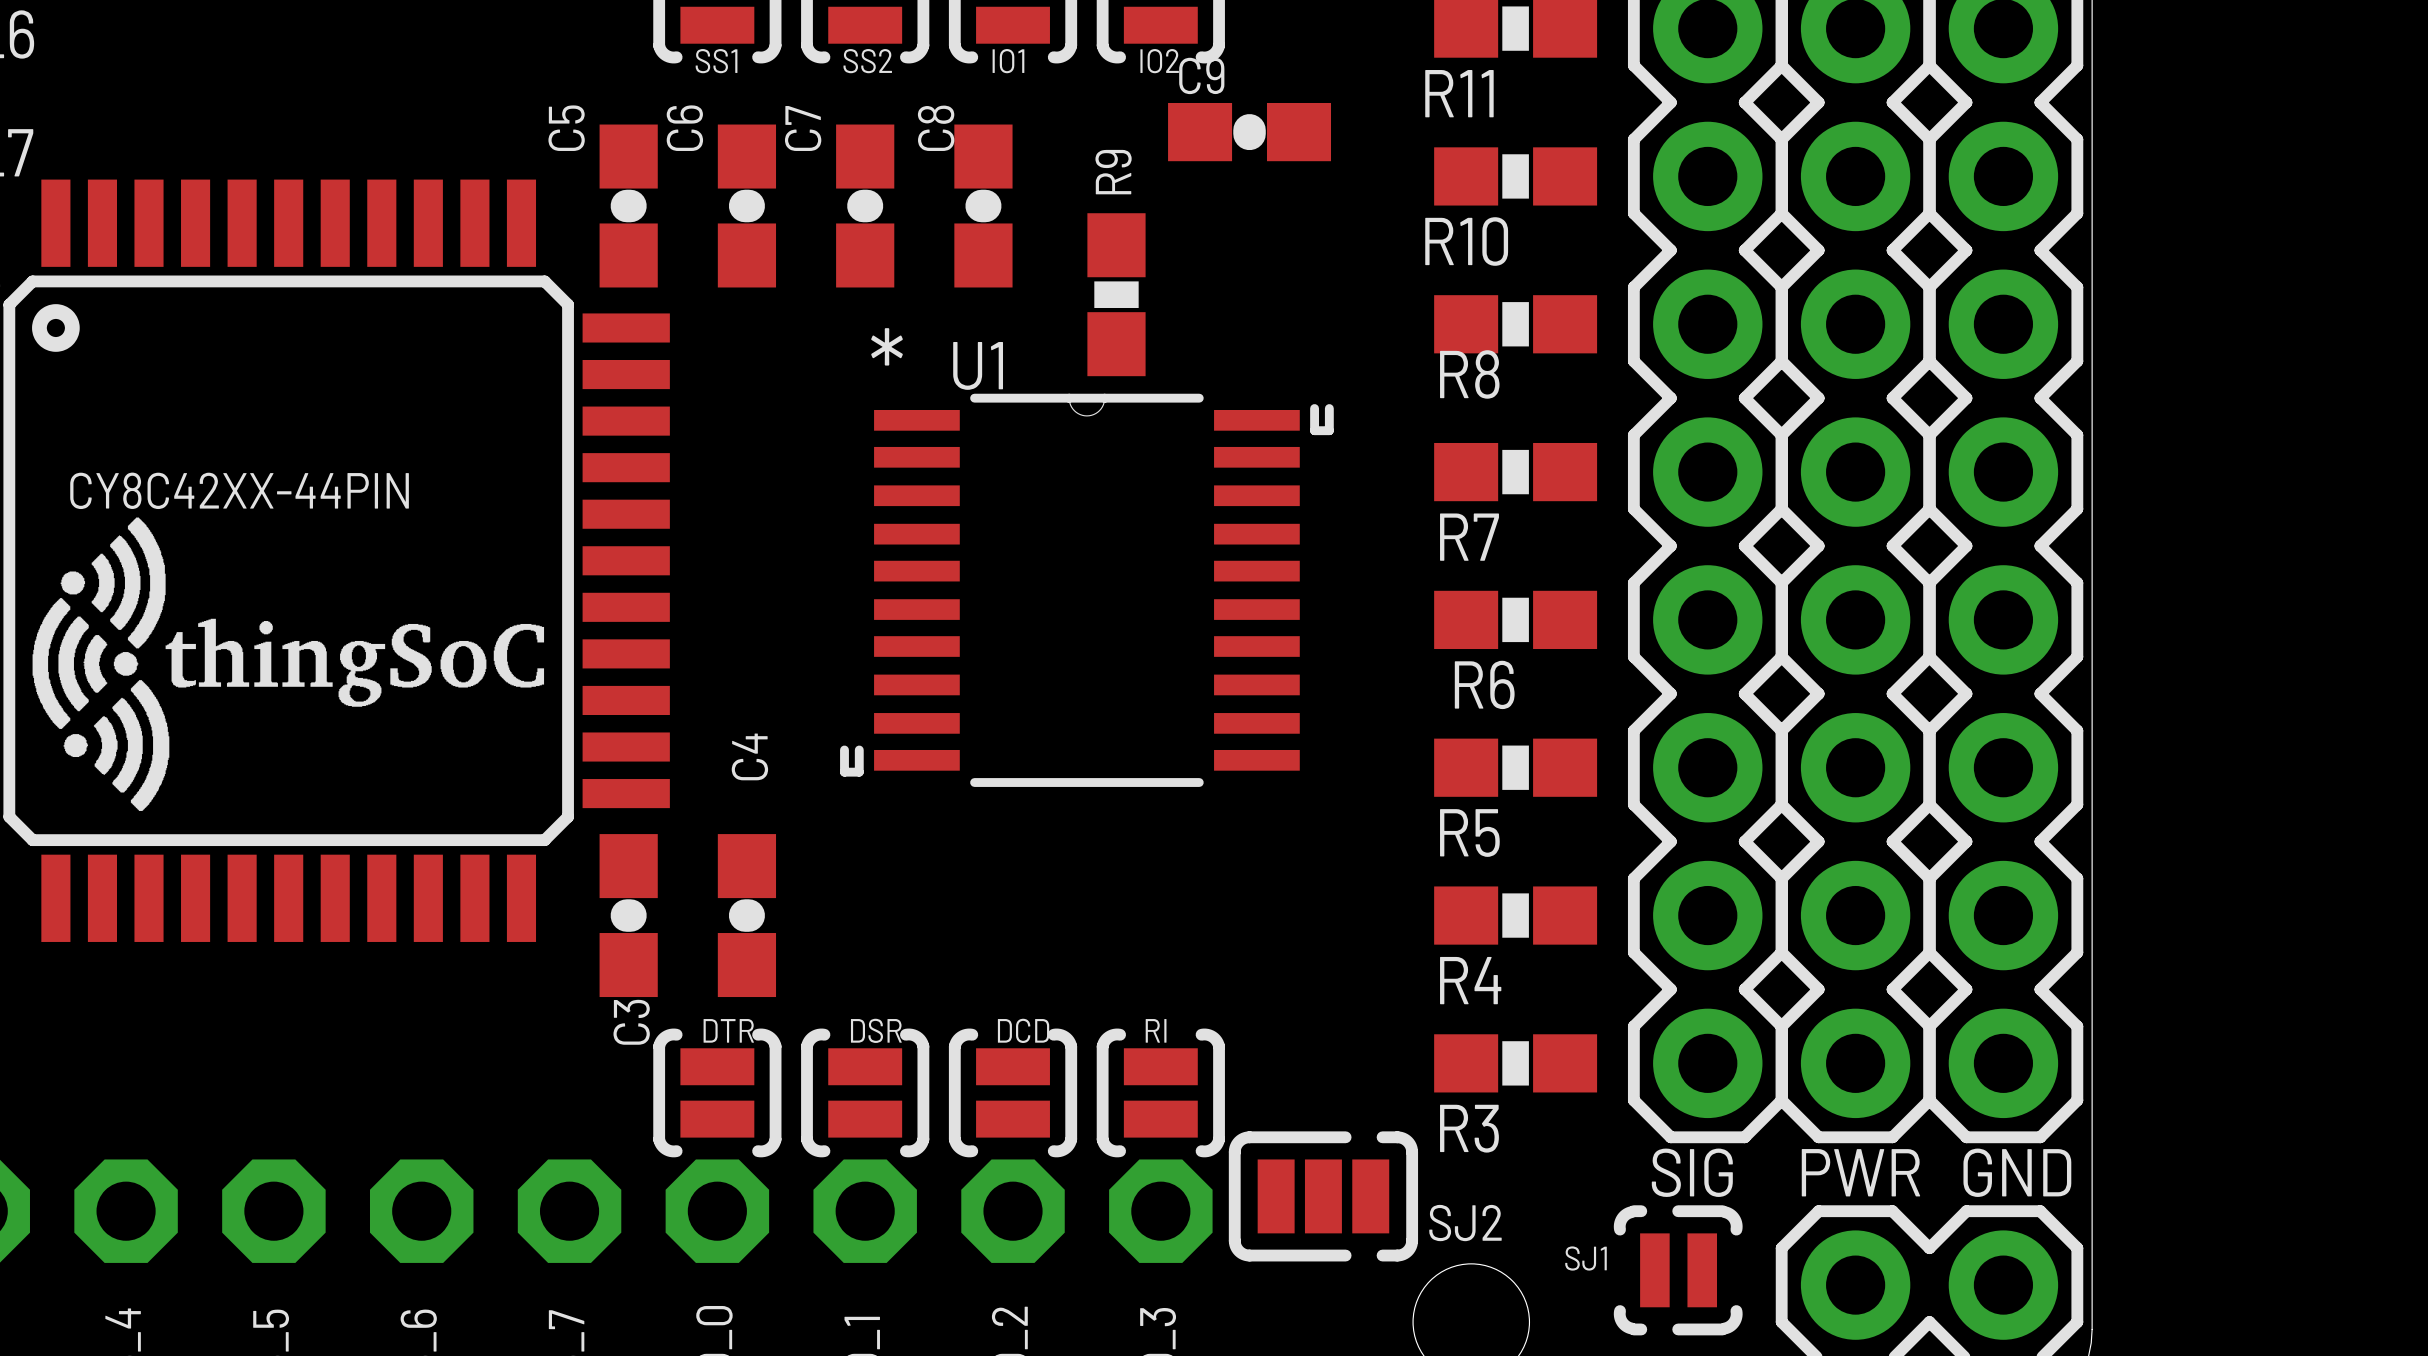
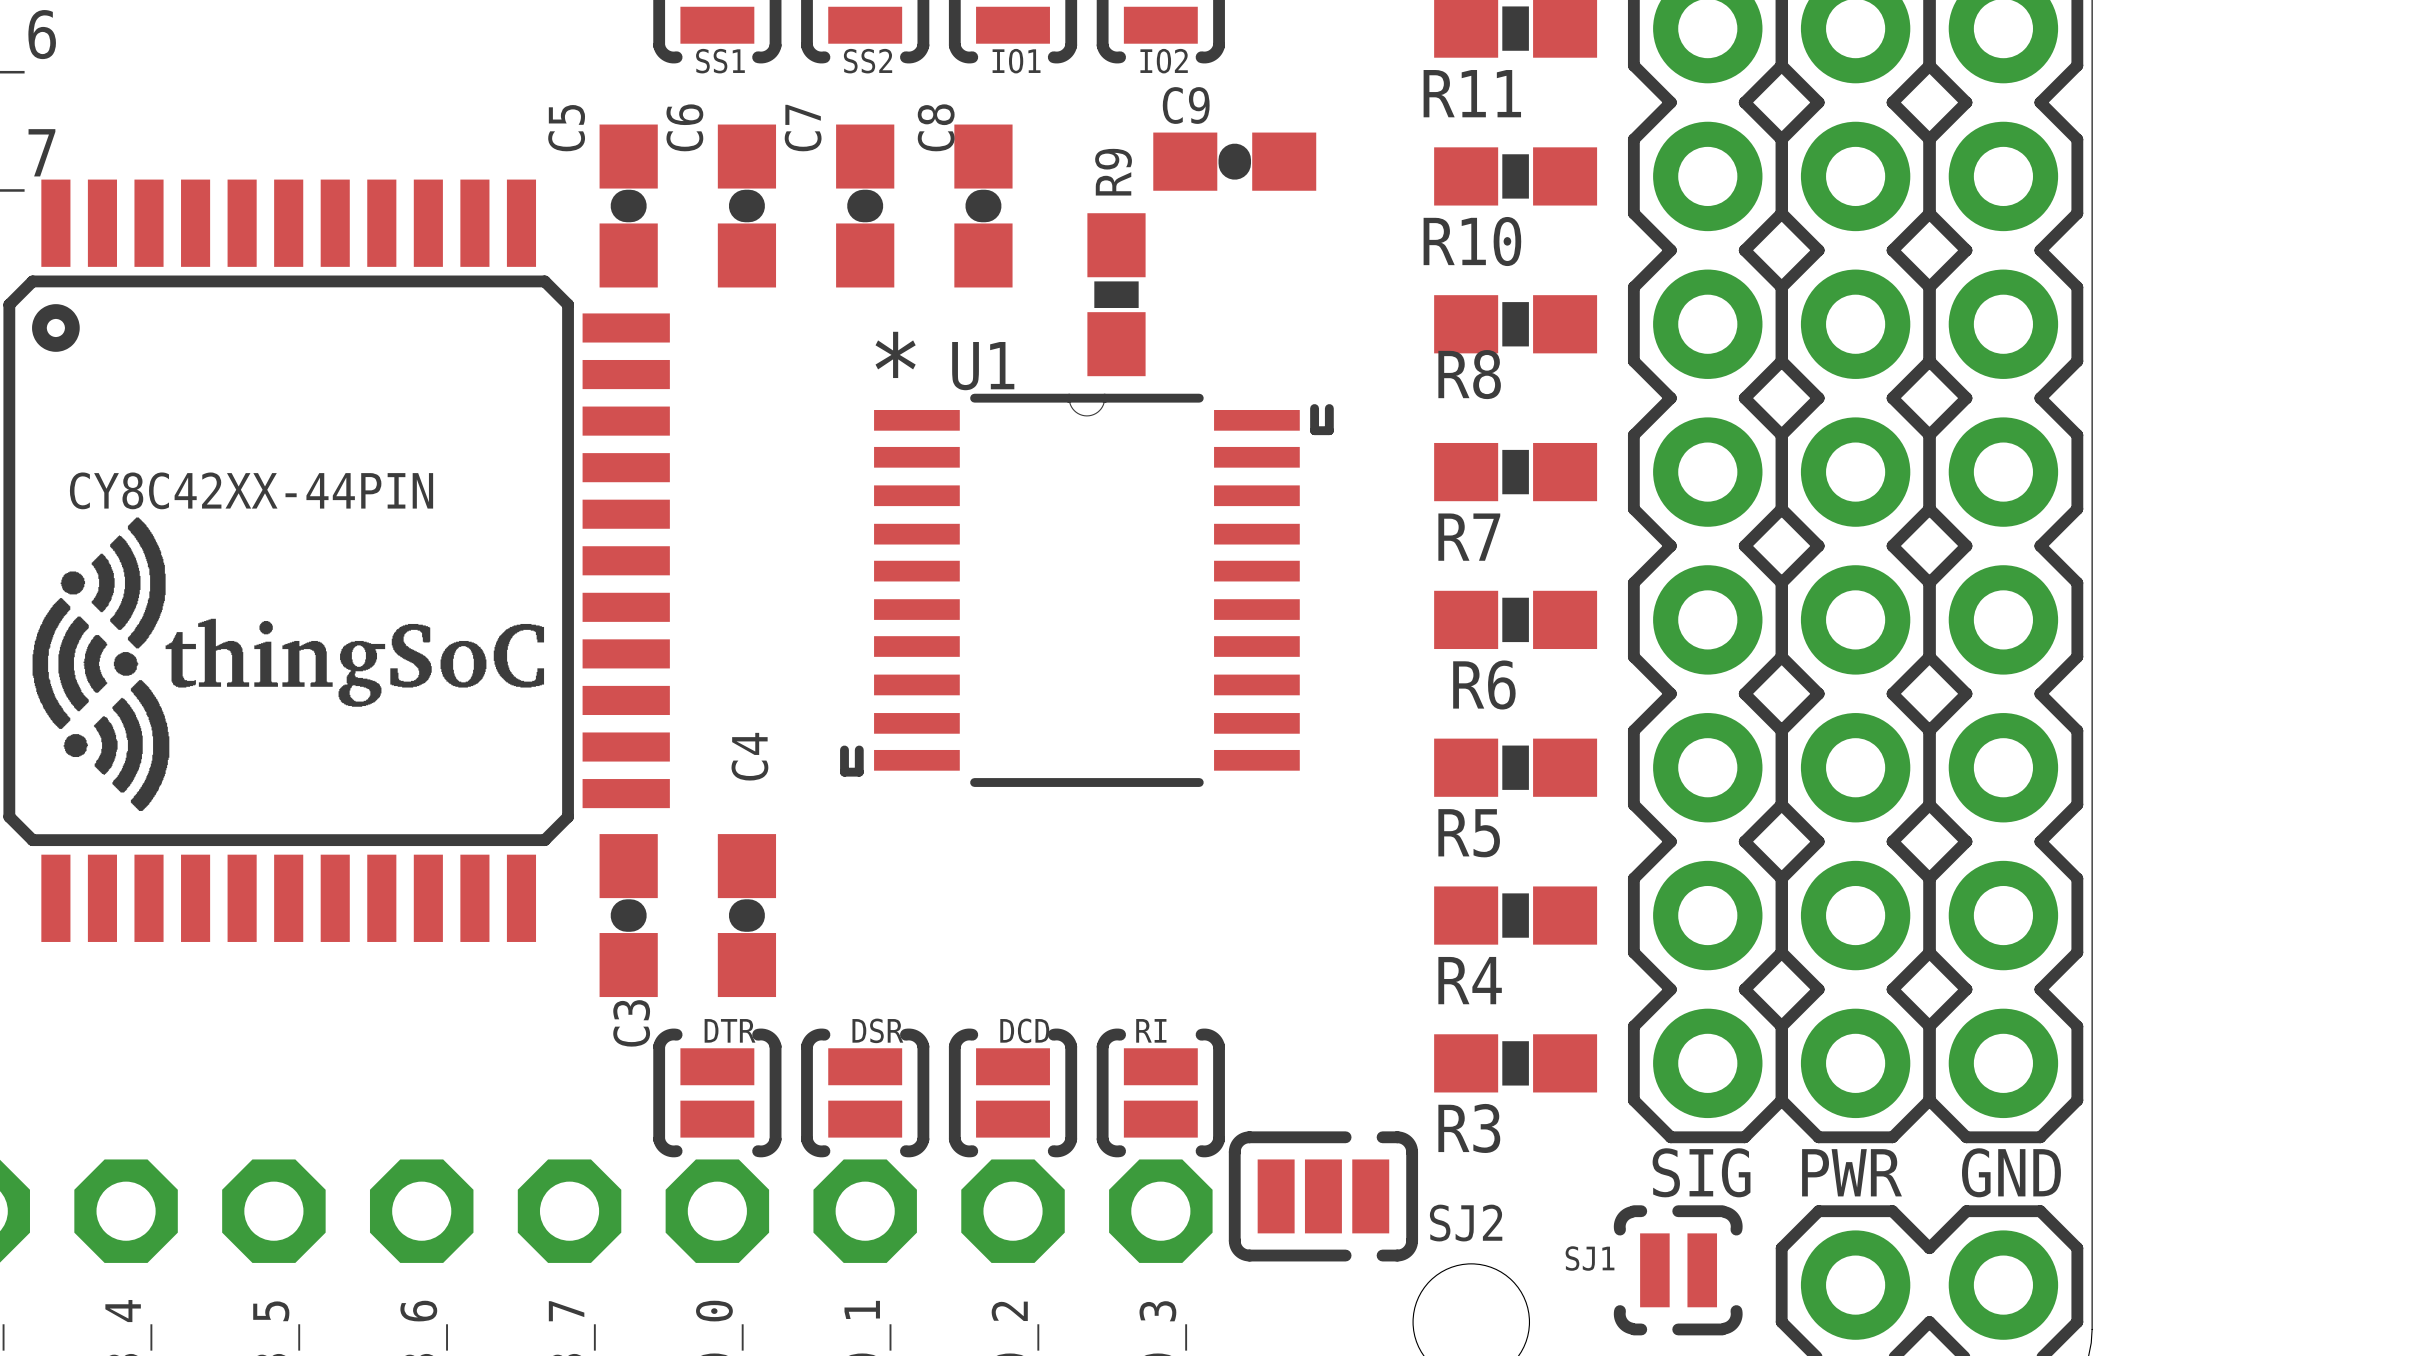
C9 position: (1249, 132) -> (1234, 161)

